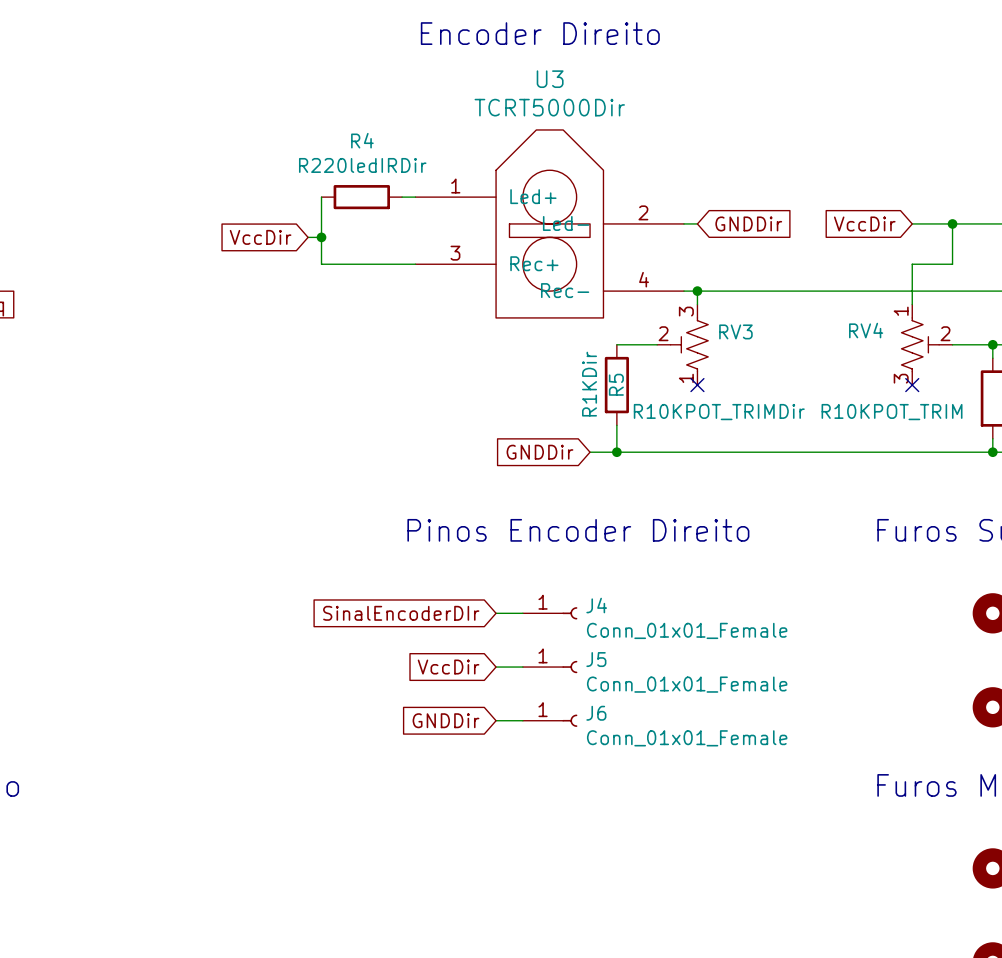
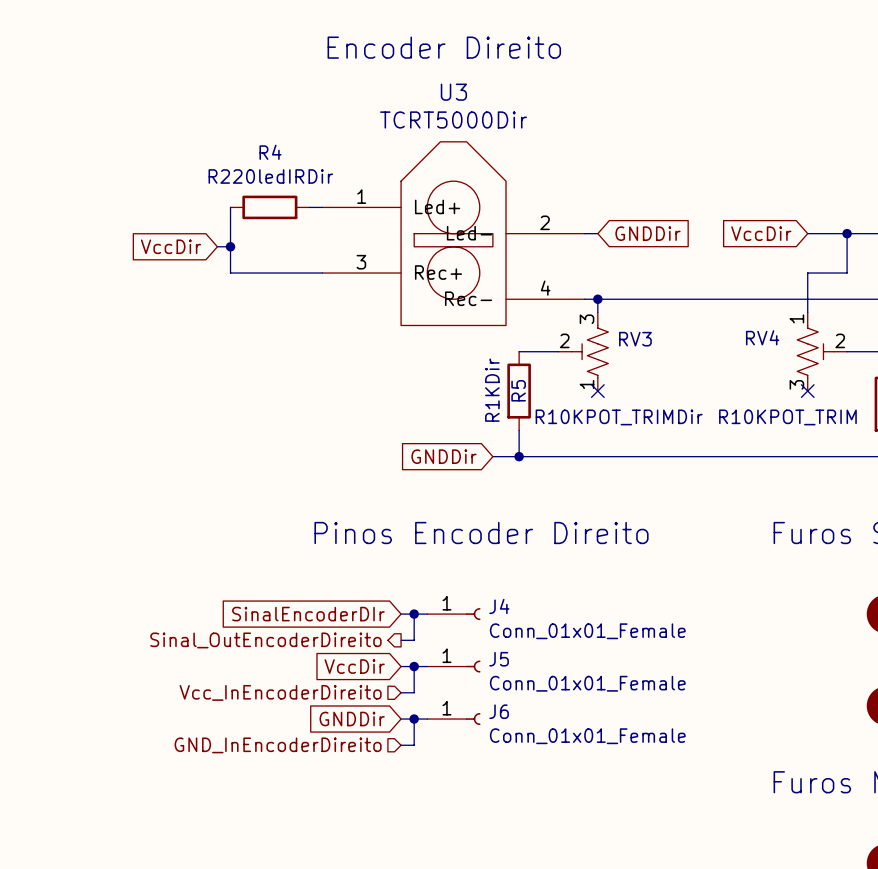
wire: none -> (414, 614) (414, 640) (401, 640)
junction: none -> (414, 614)
hierarchical label: none -> Sinal_OutEncoderDireito (265, 640)
wire: none -> (414, 666) (414, 692) (401, 692)
junction: none -> (414, 666)
hierarchical label: none -> Vcc_InEncoderDireito (280, 692)
wire: none -> (414, 719) (414, 745) (401, 745)
junction: none -> (414, 719)
hierarchical label: none -> GND_InEncoderDireito (278, 745)

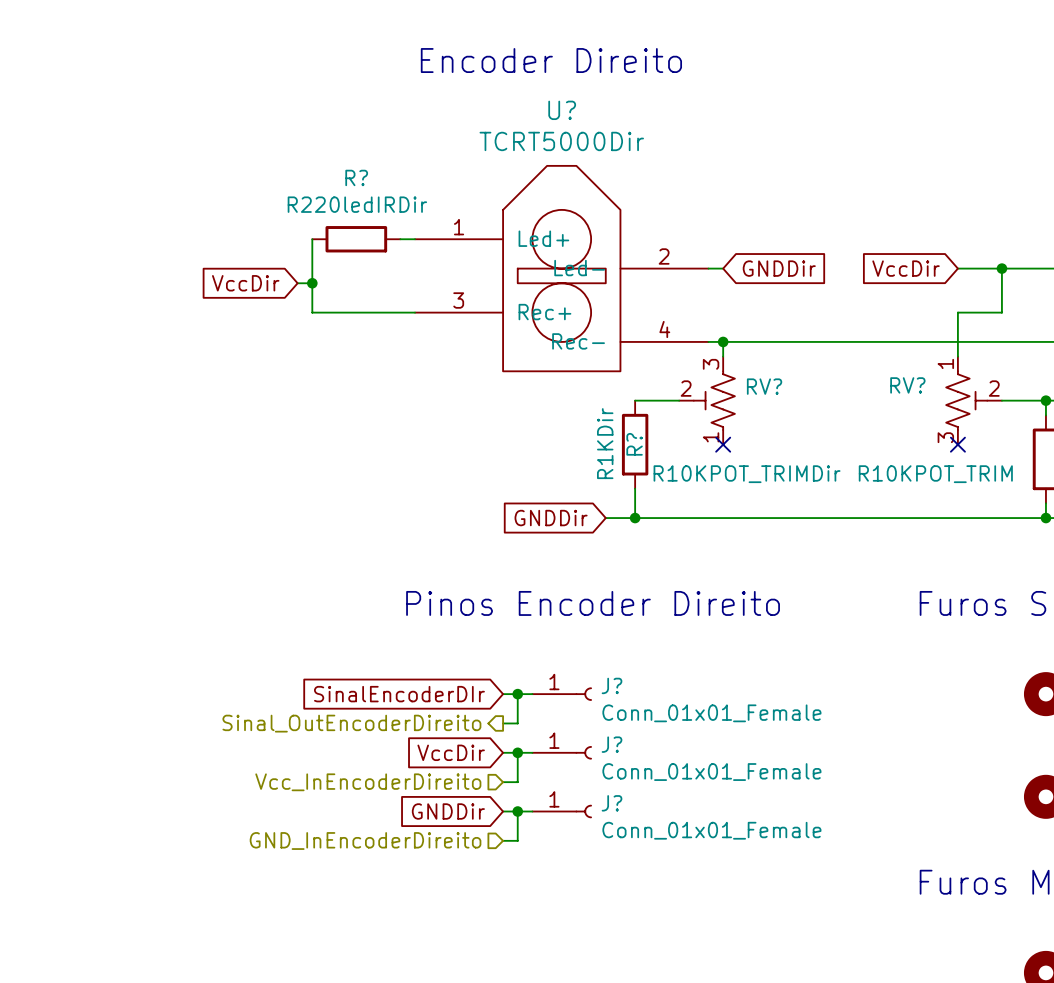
U3 name: U3 (453, 92) -> U? (562, 110)
R4 name: R4 (270, 152) -> R? (356, 177)
RV4 name: RV4 (762, 337) -> RV? (907, 385)
RV3 name: RV3 (635, 339) -> RV? (764, 386)
R5 name: R5 (518, 390) -> R? (634, 444)
J4 name: J4 (499, 606) -> J? (612, 685)
J5 name: J5 (499, 659) -> J? (612, 744)
J6 name: J6 (499, 711) -> J? (612, 803)

